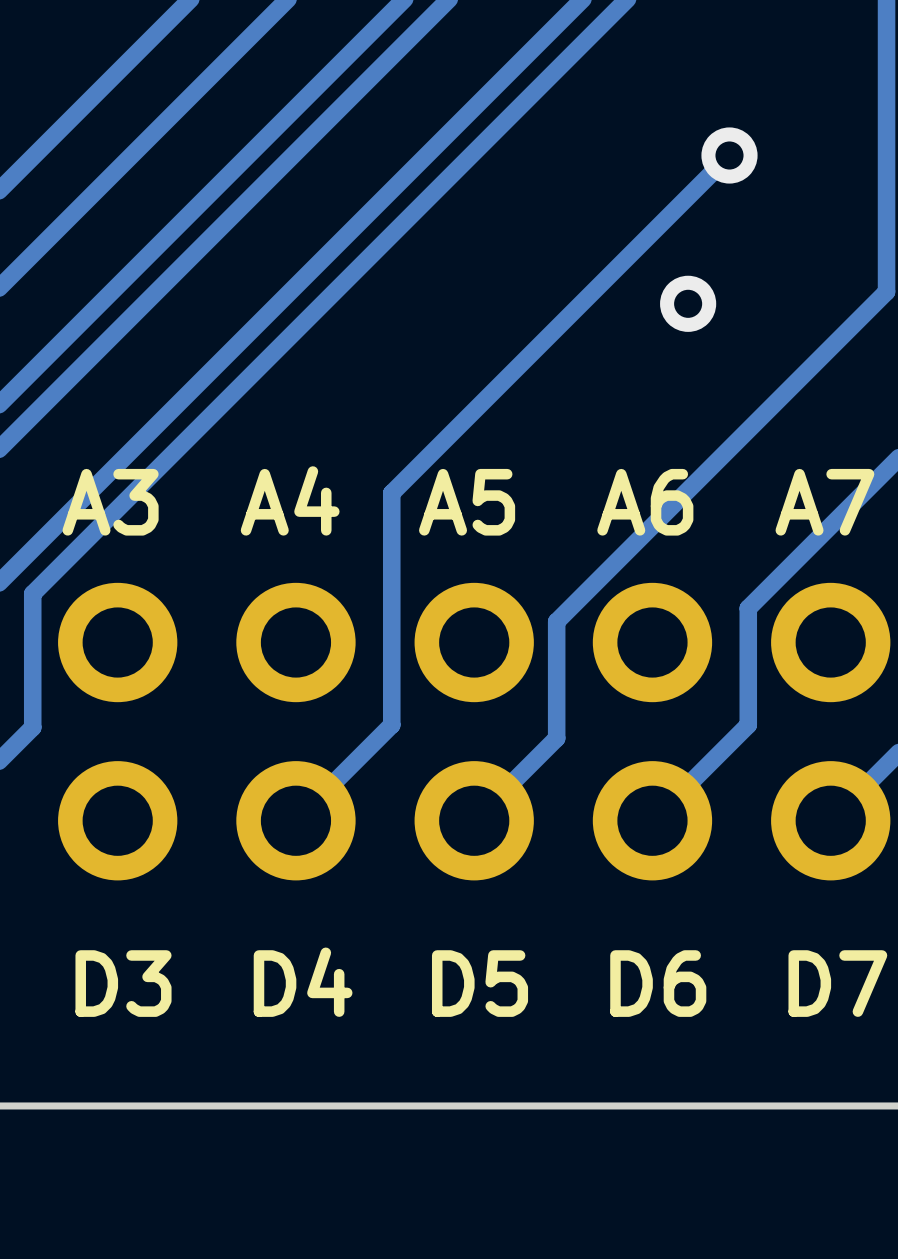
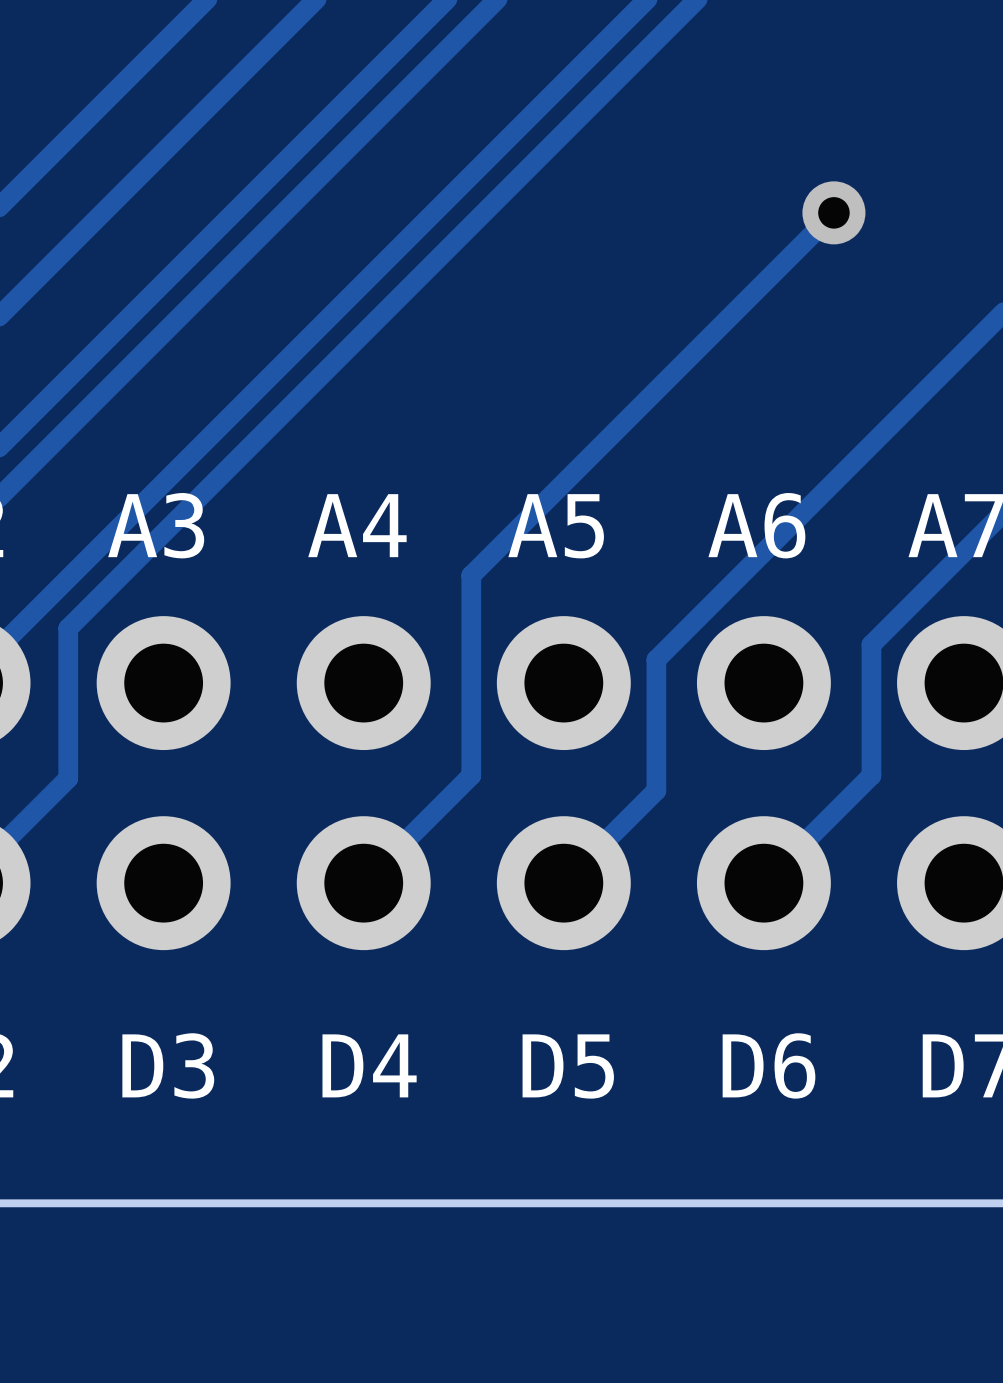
track: (729, 155) (391, 493) (391, 546) -> (833, 212) (471, 575)
via: (729, 155) -> none
via: none -> (833, 212)
via: (688, 303) -> none

